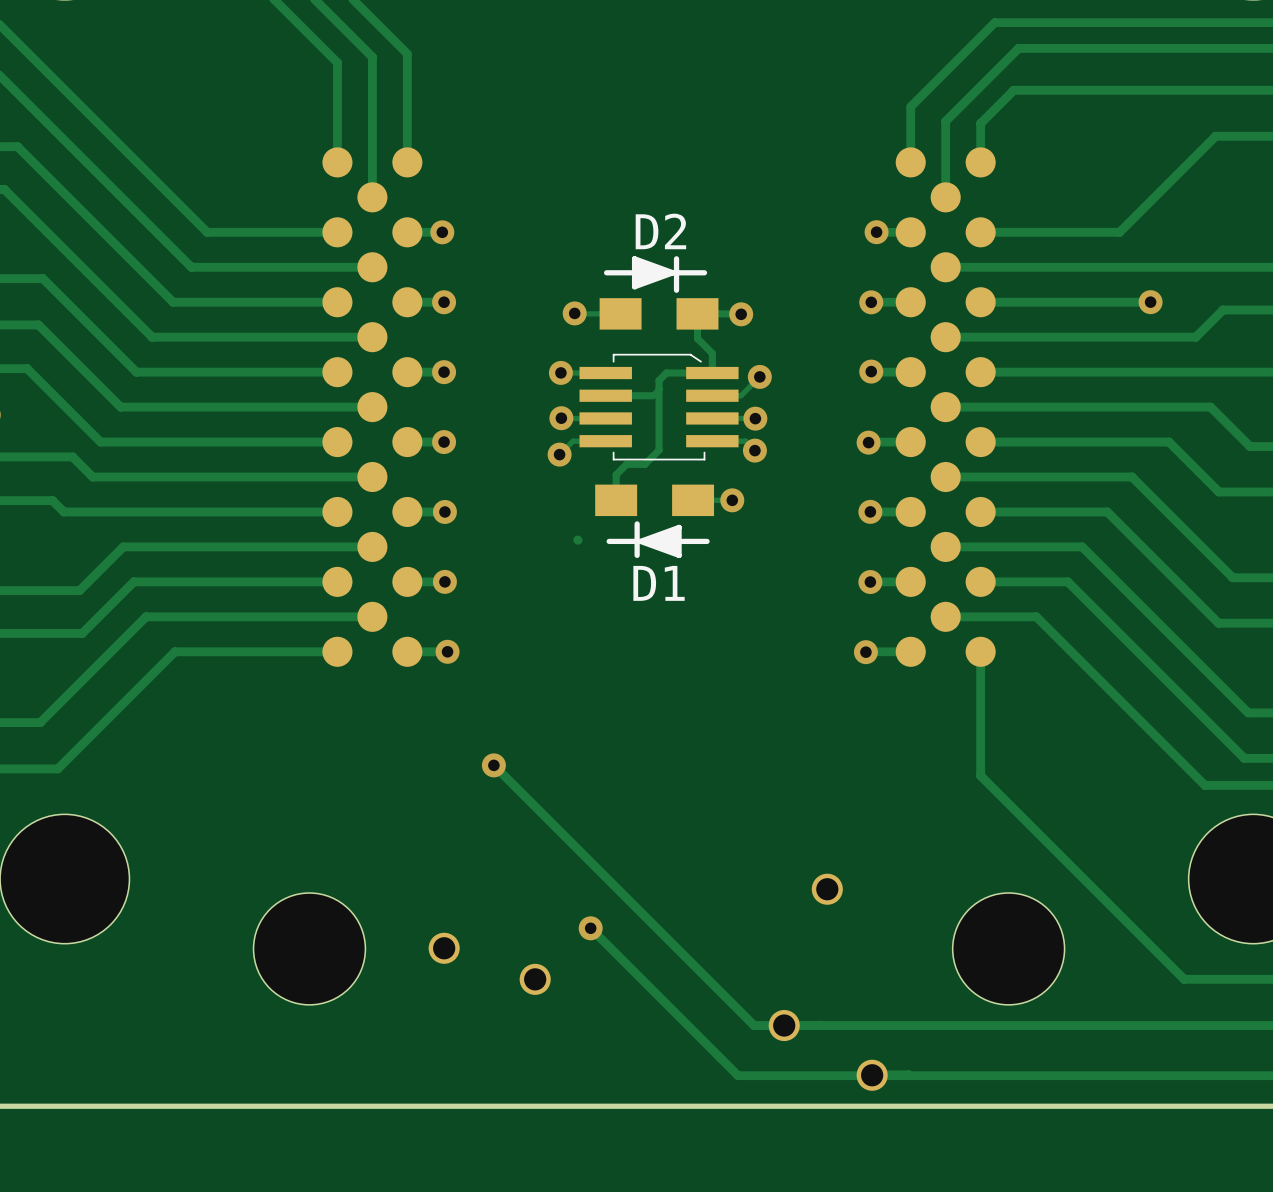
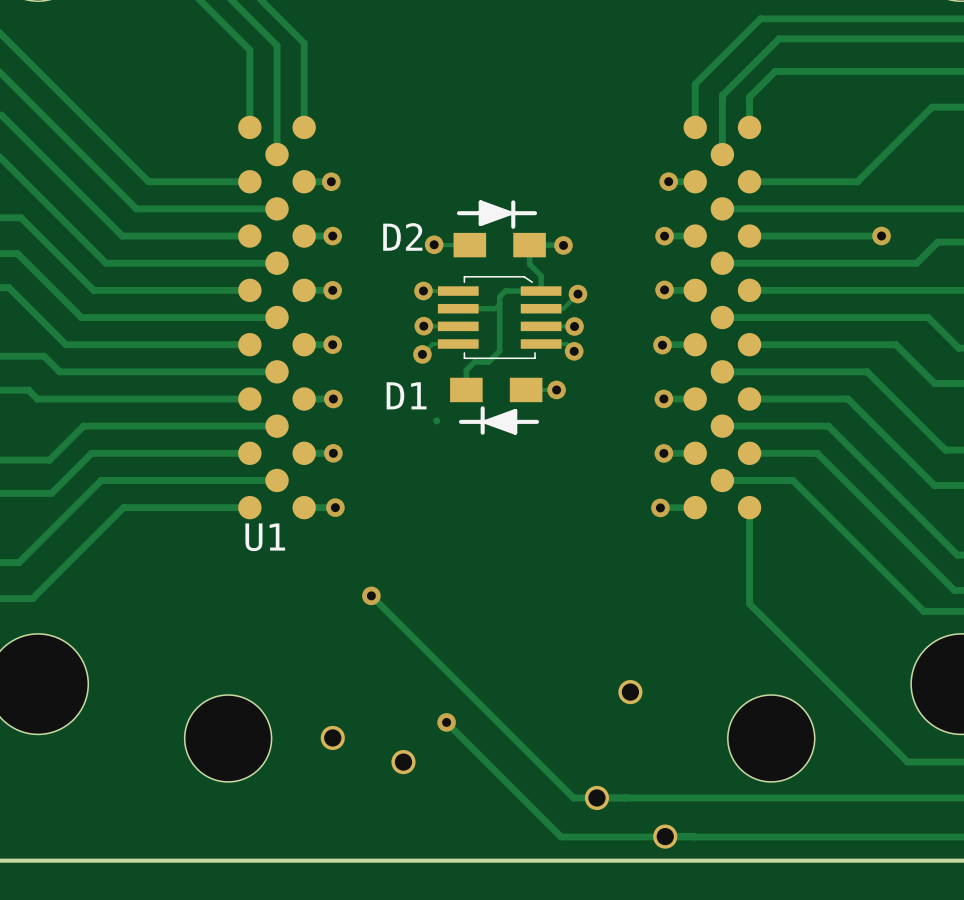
D2 name position: D2 (660, 231) -> D2 (402, 236)
D1 name position: D1 (659, 583) -> D1 (406, 395)
U1 name: none -> U1 (265, 537)

